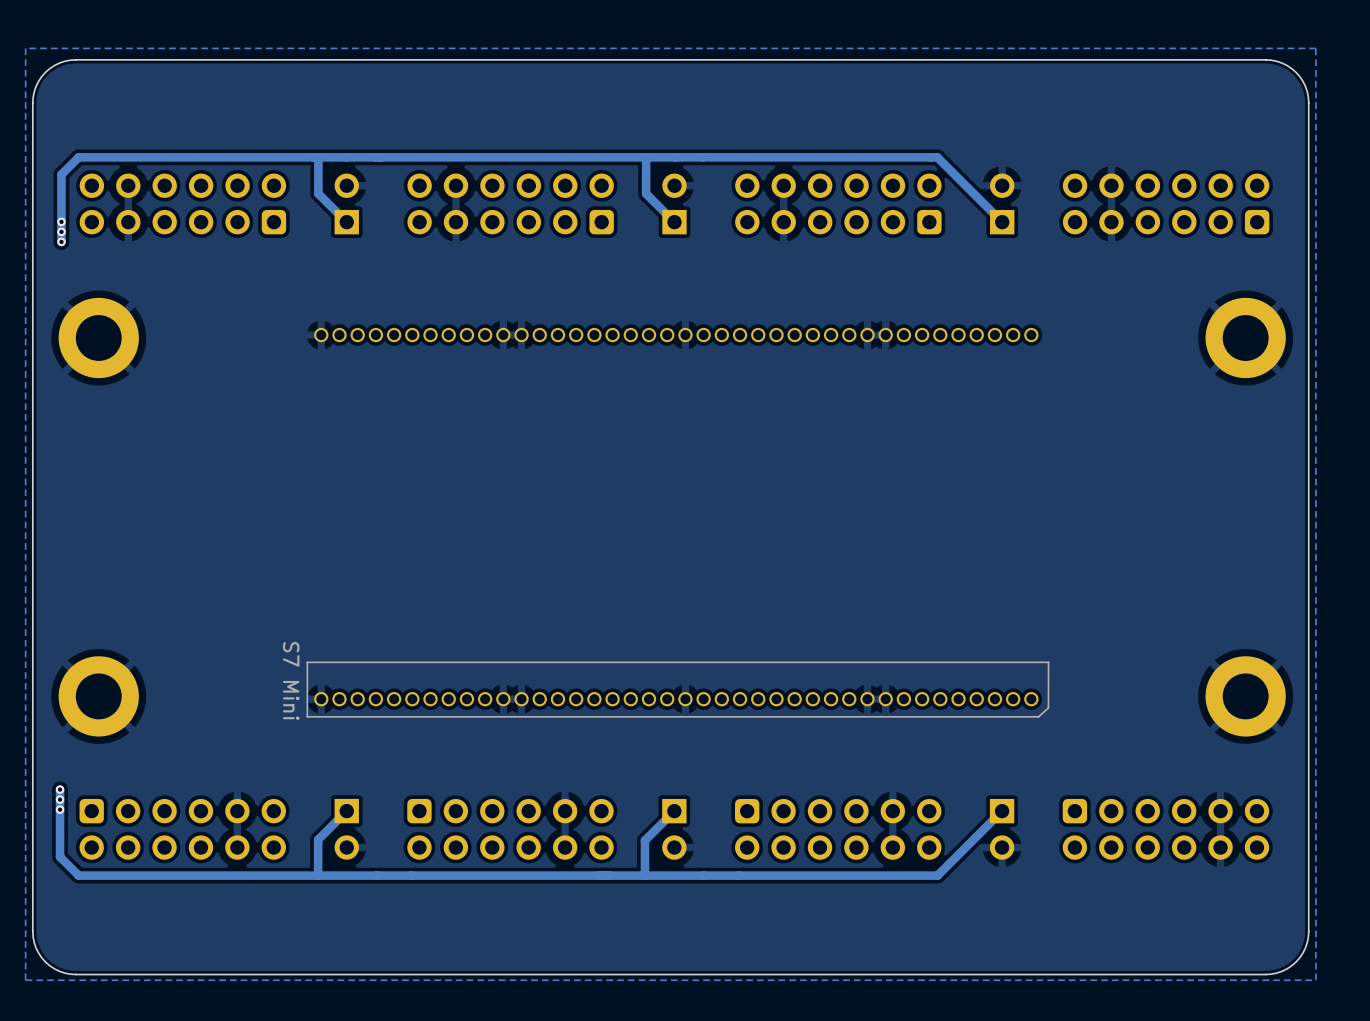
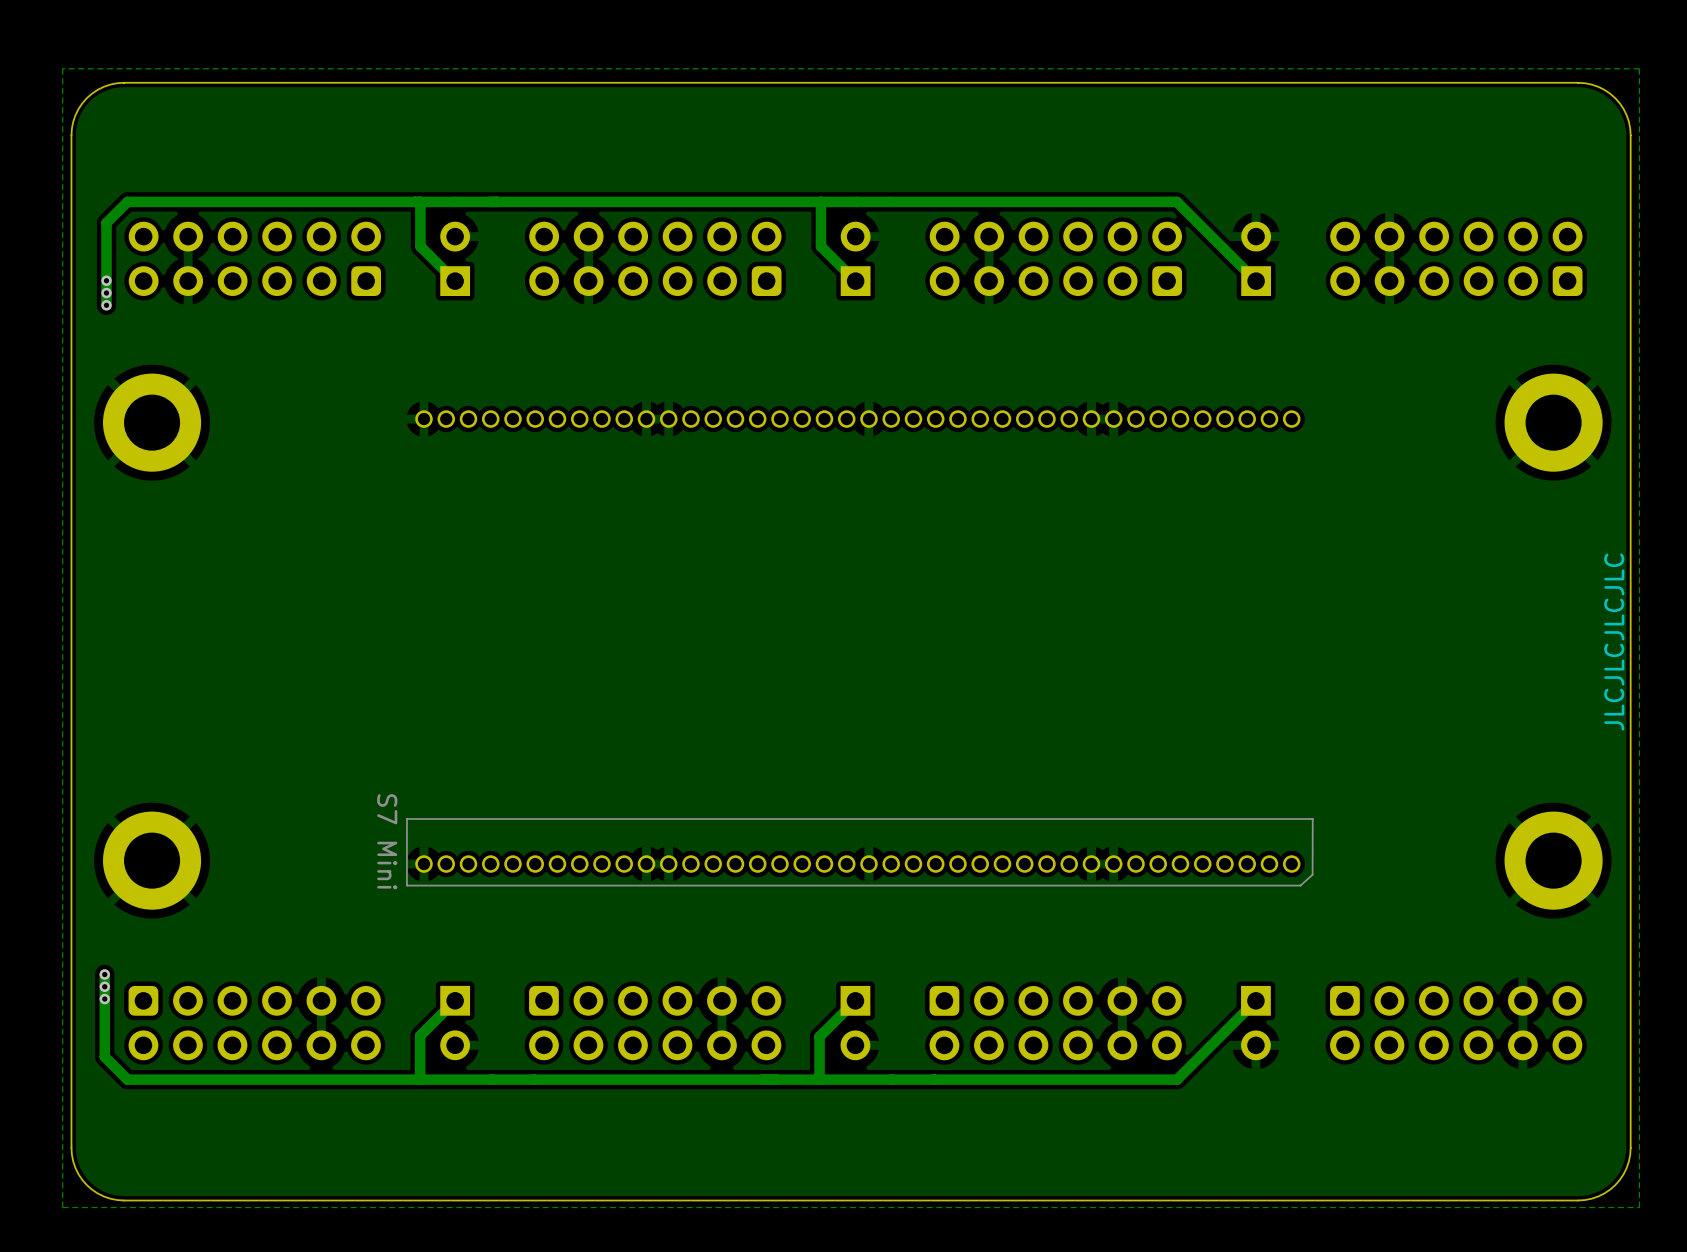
text: none -> JLCJLCJLCJLC (1614, 642)

